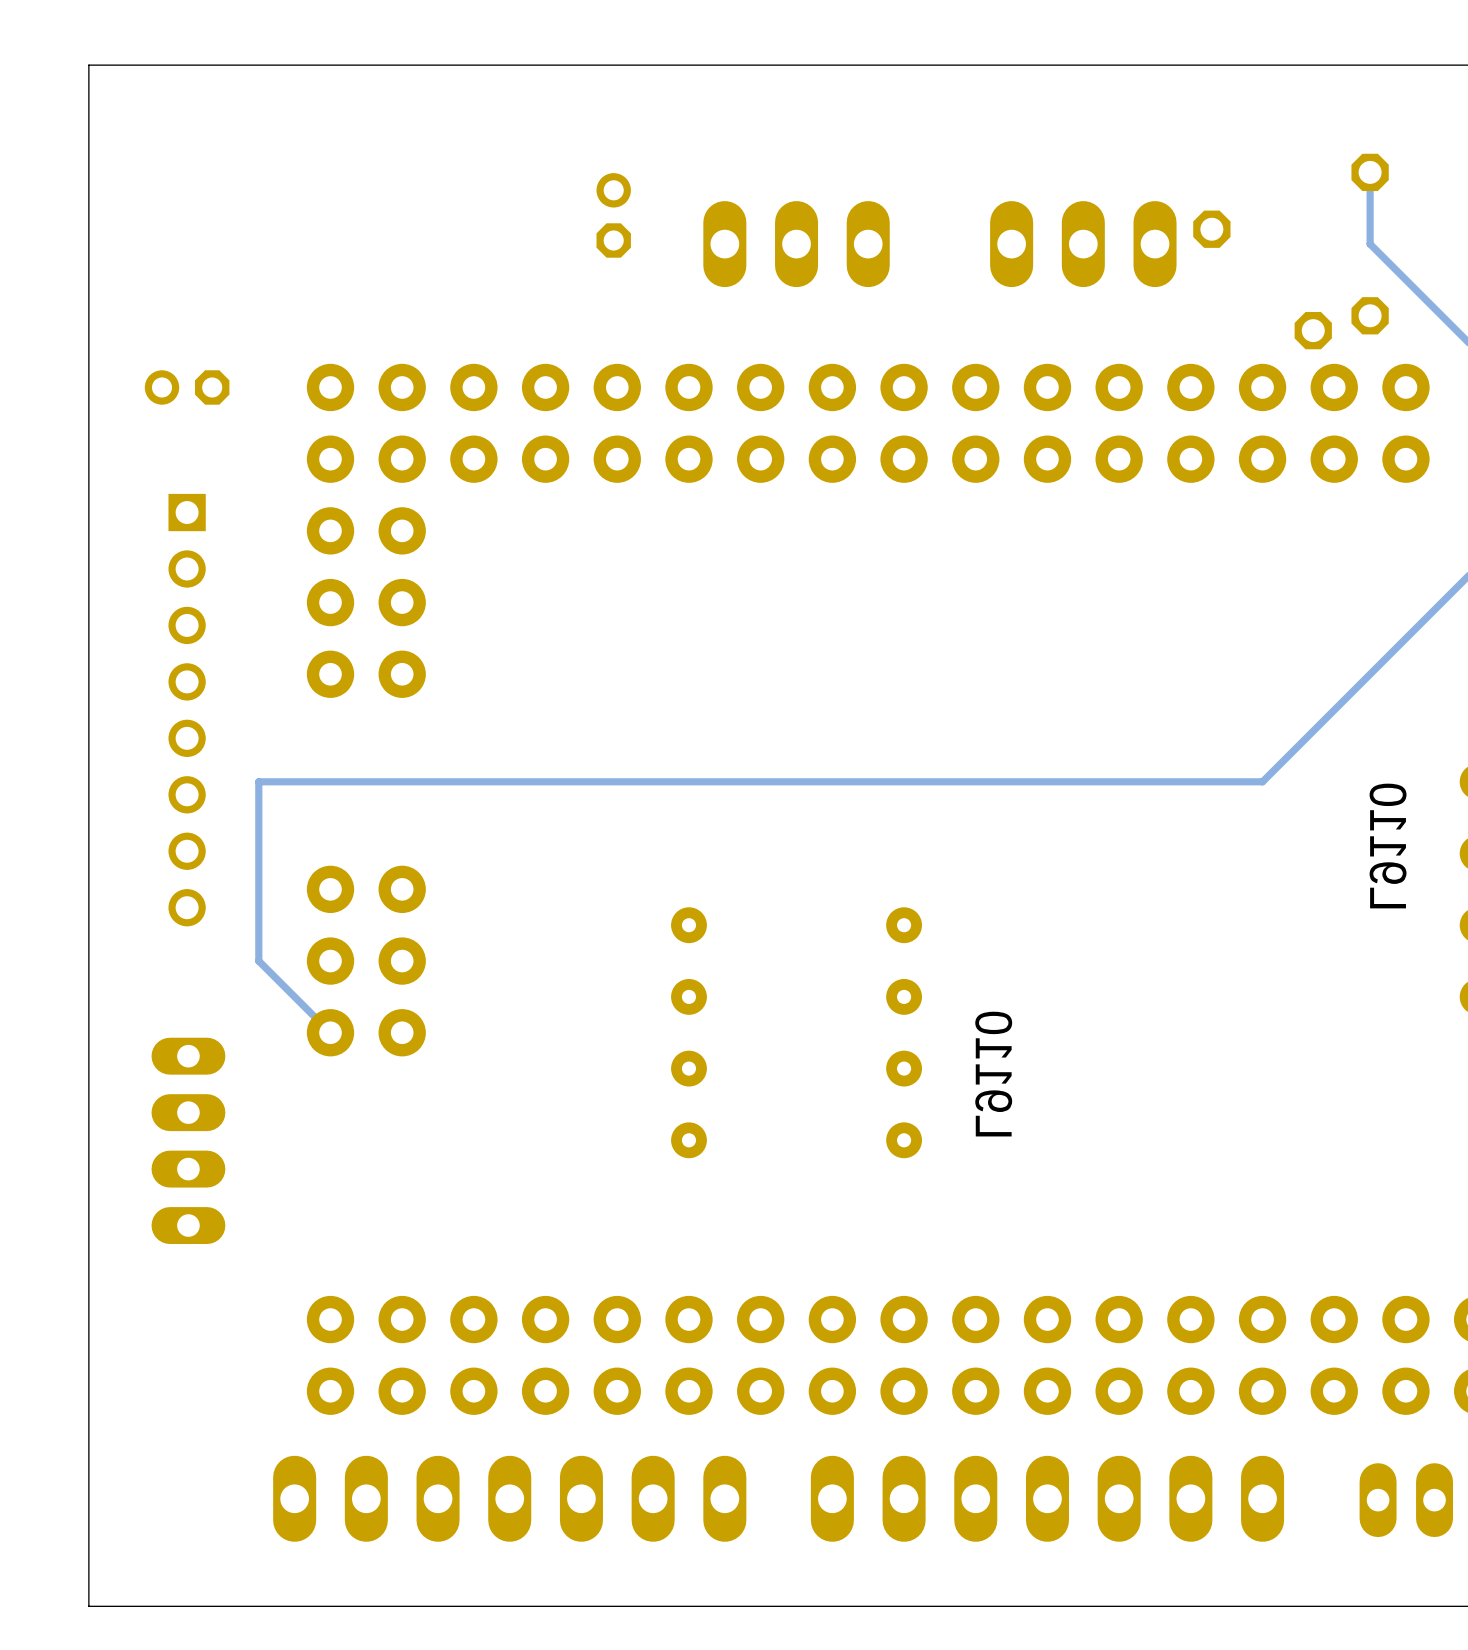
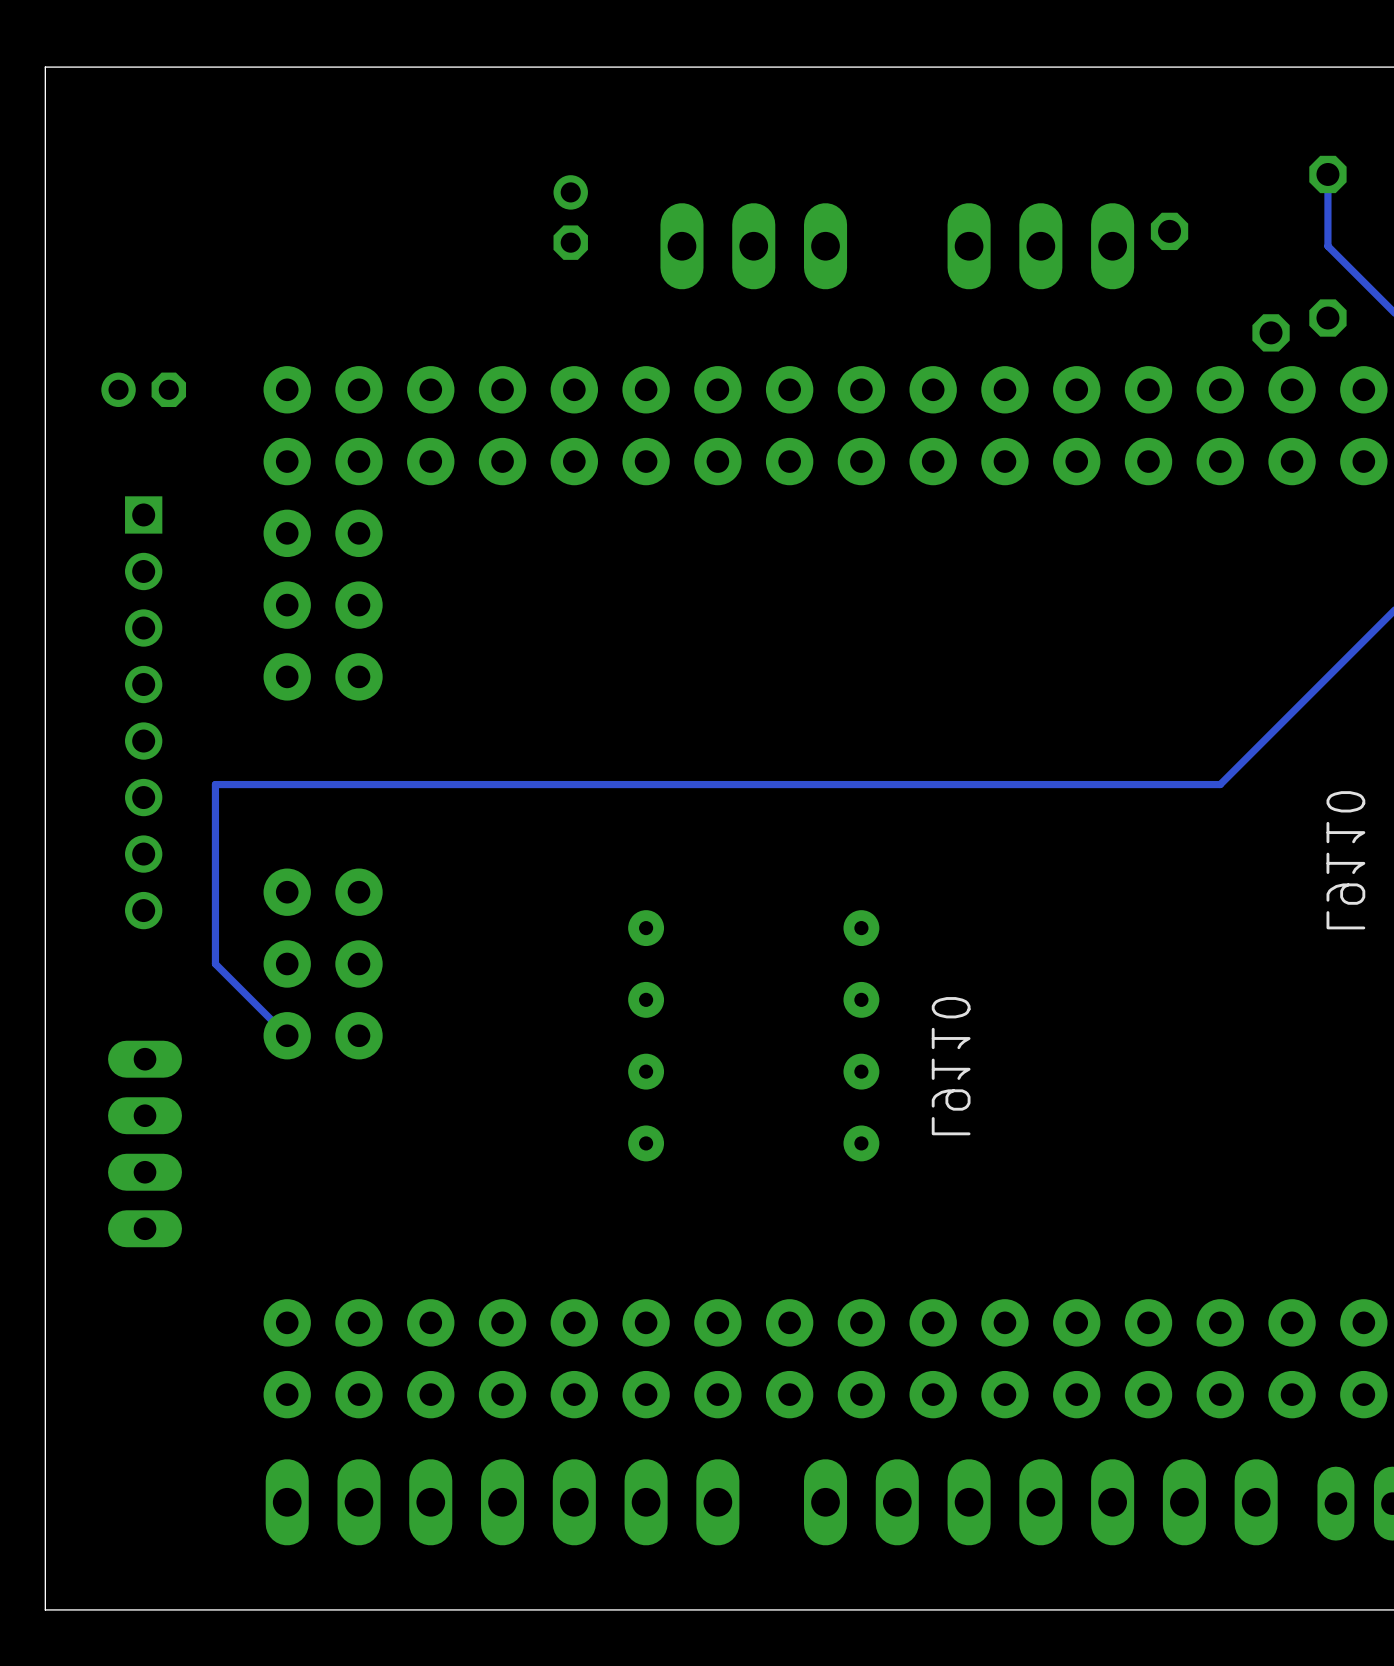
part position: (509, 1498) -> (502, 1502)
part position: (1047, 1498) -> (1040, 1502)

